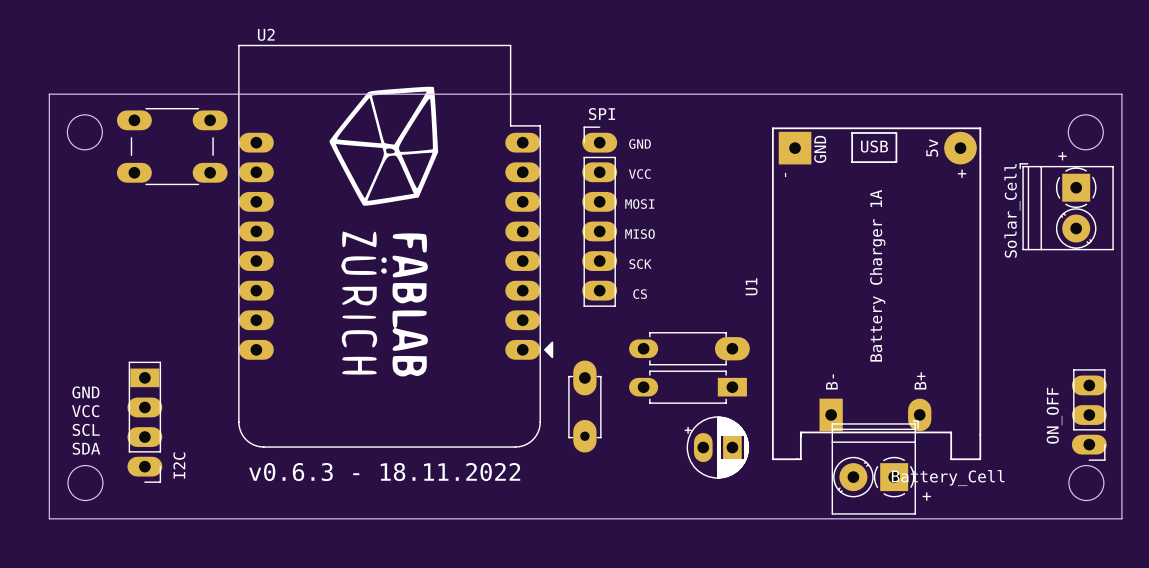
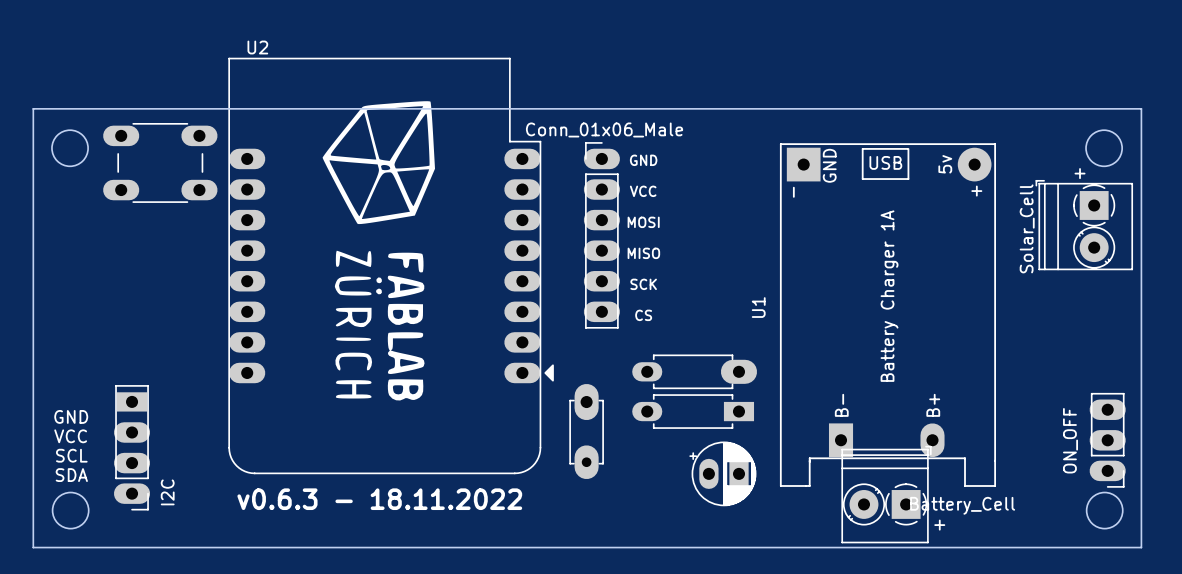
part value: SPI (601, 114) -> Conn_01x06_Male (604, 129)

